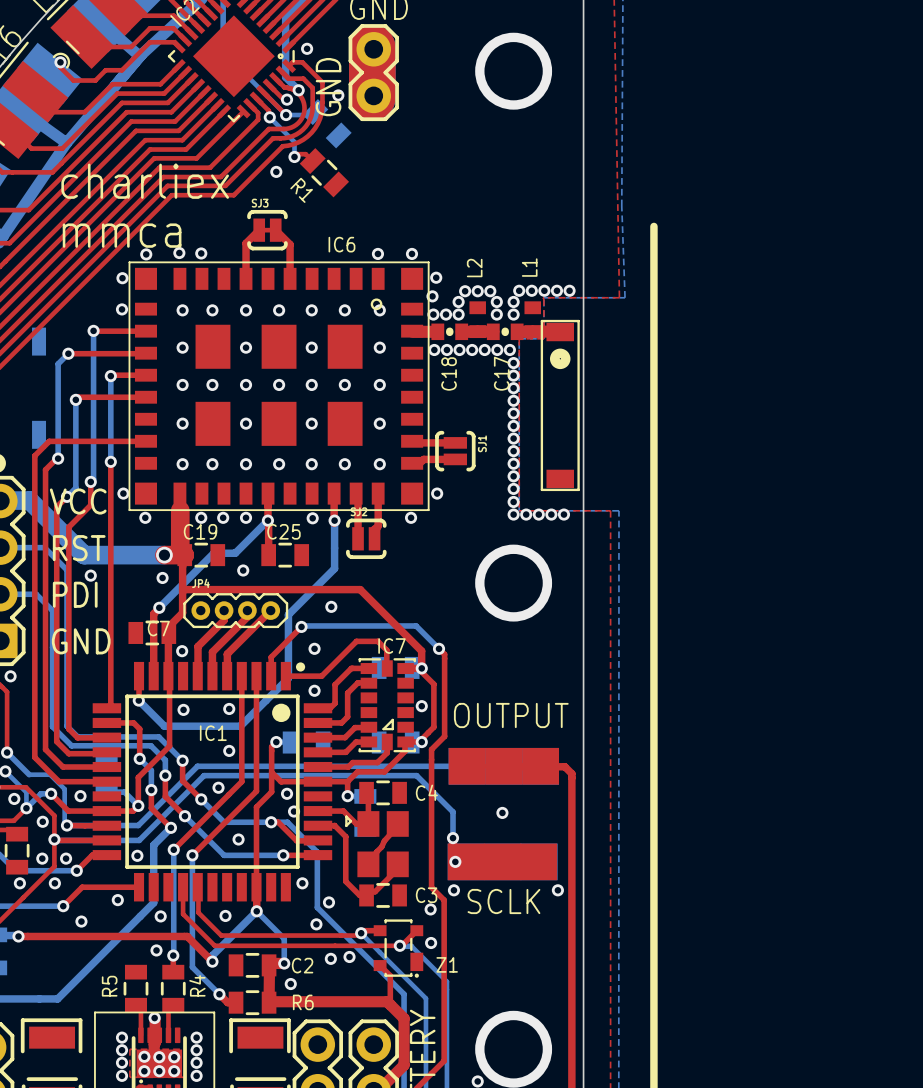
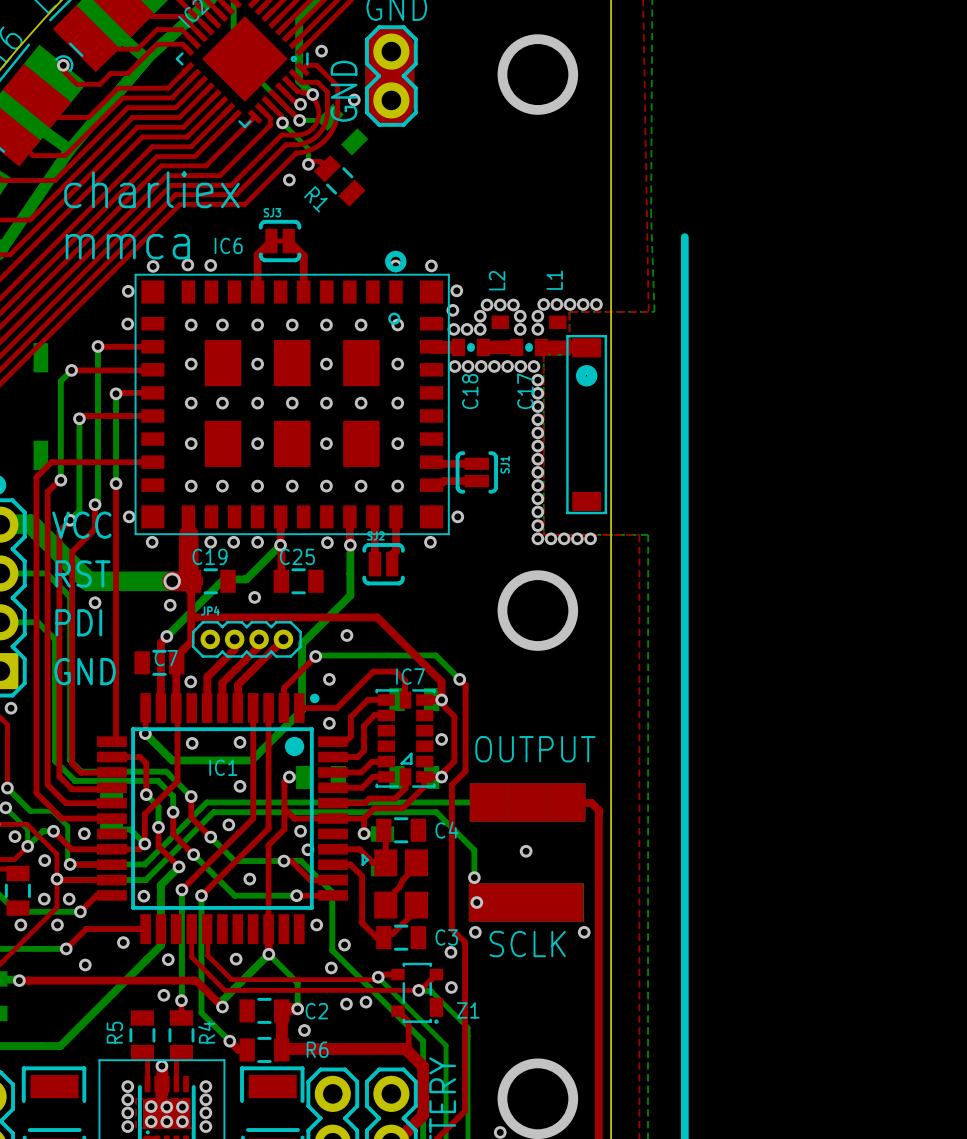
drawing: none -> [385, 250, 407, 273]
IC6 name position: IC6 (341, 244) -> IC6 (228, 245)

